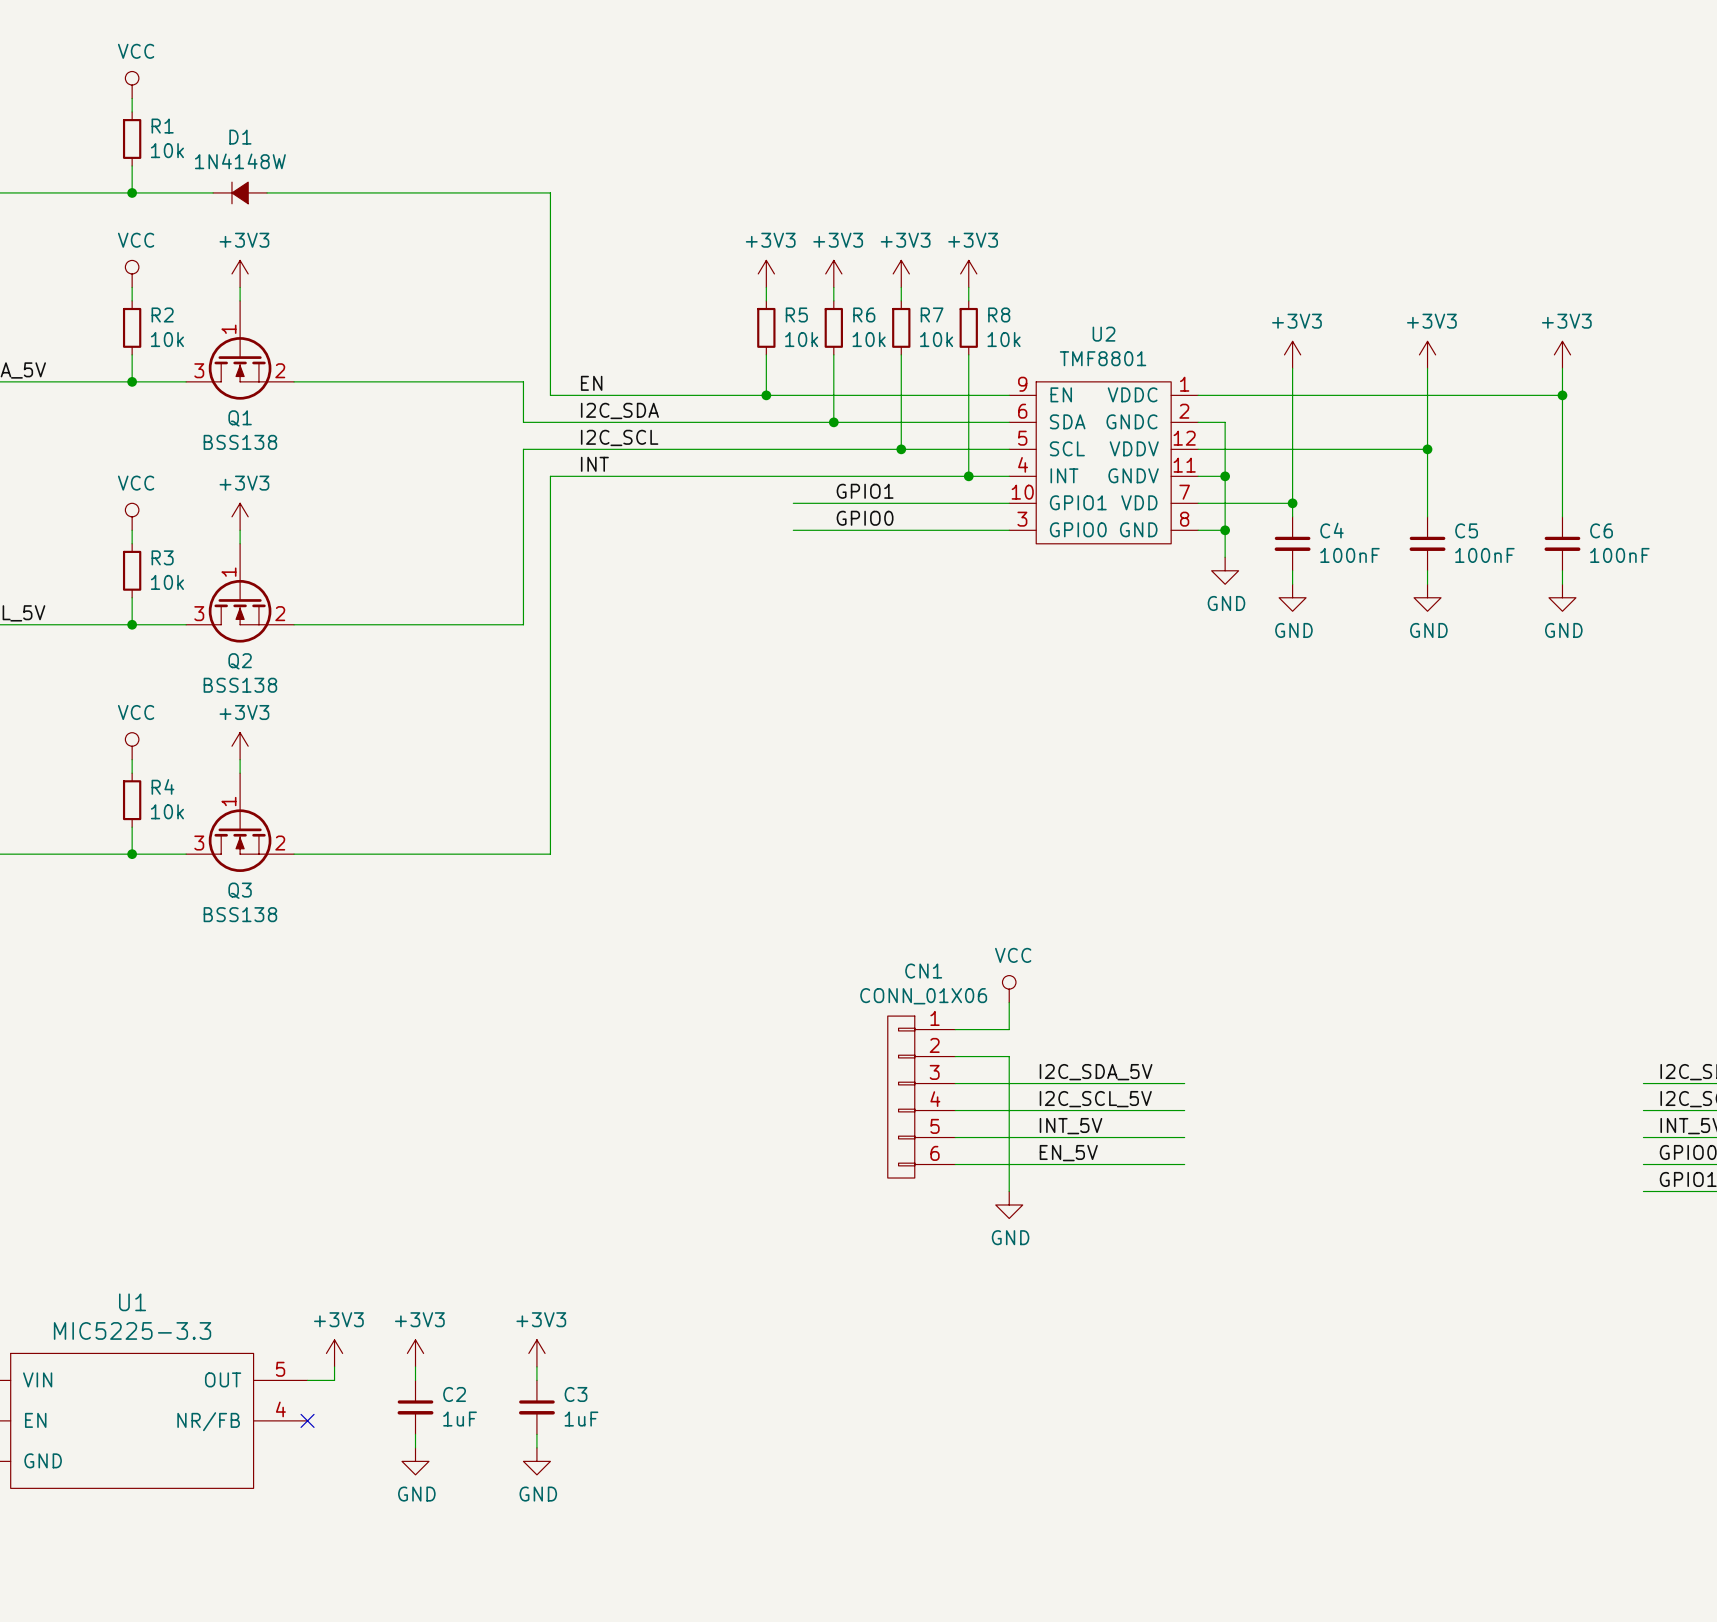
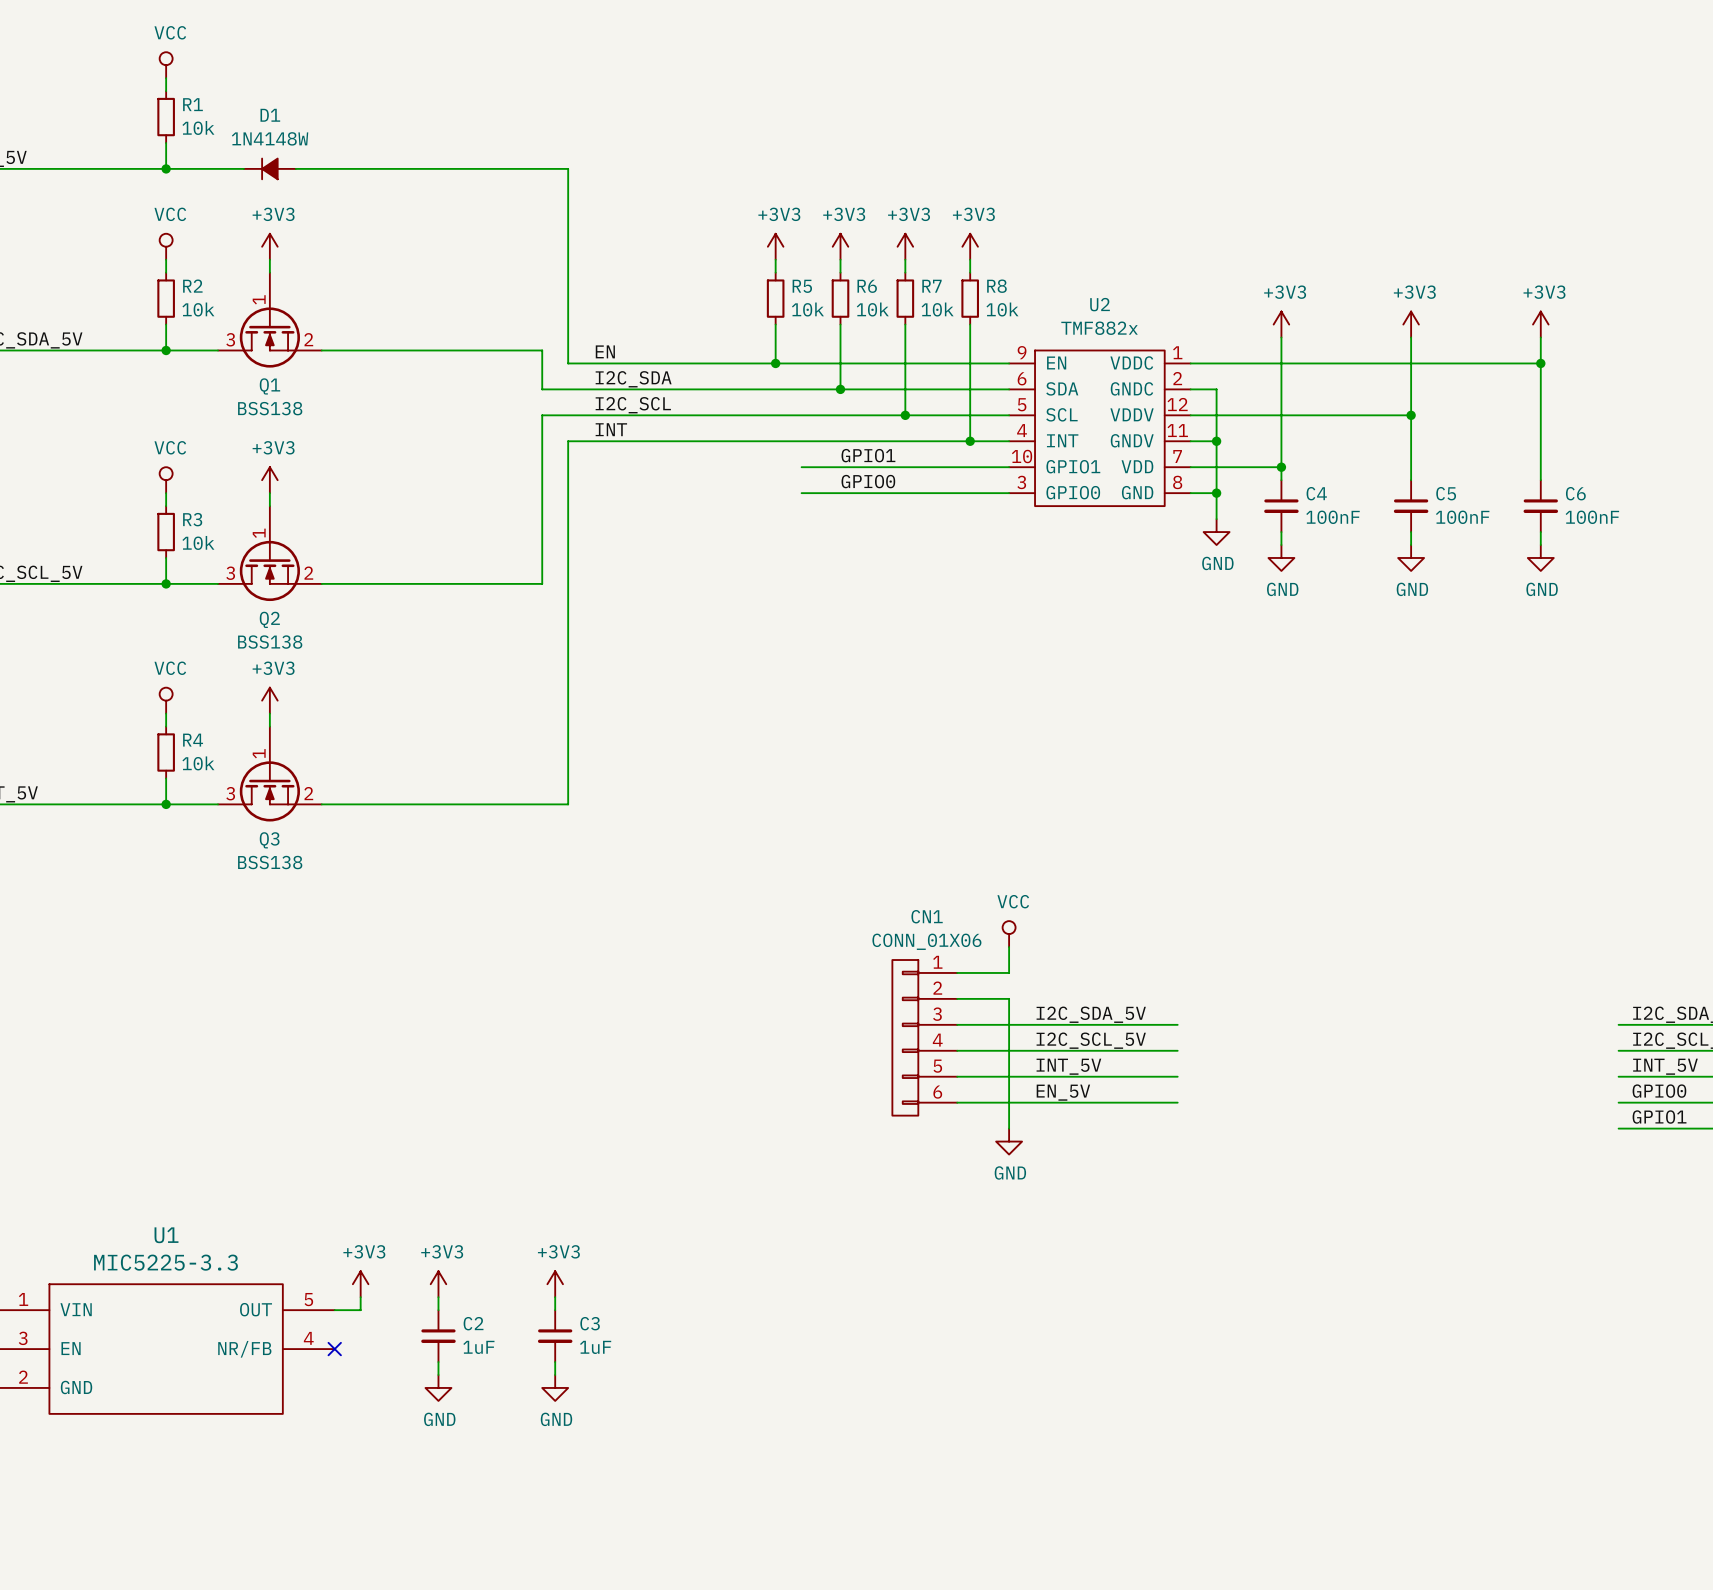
U2 value: TMF8801 (1103, 358) -> TMF882x (1099, 328)

